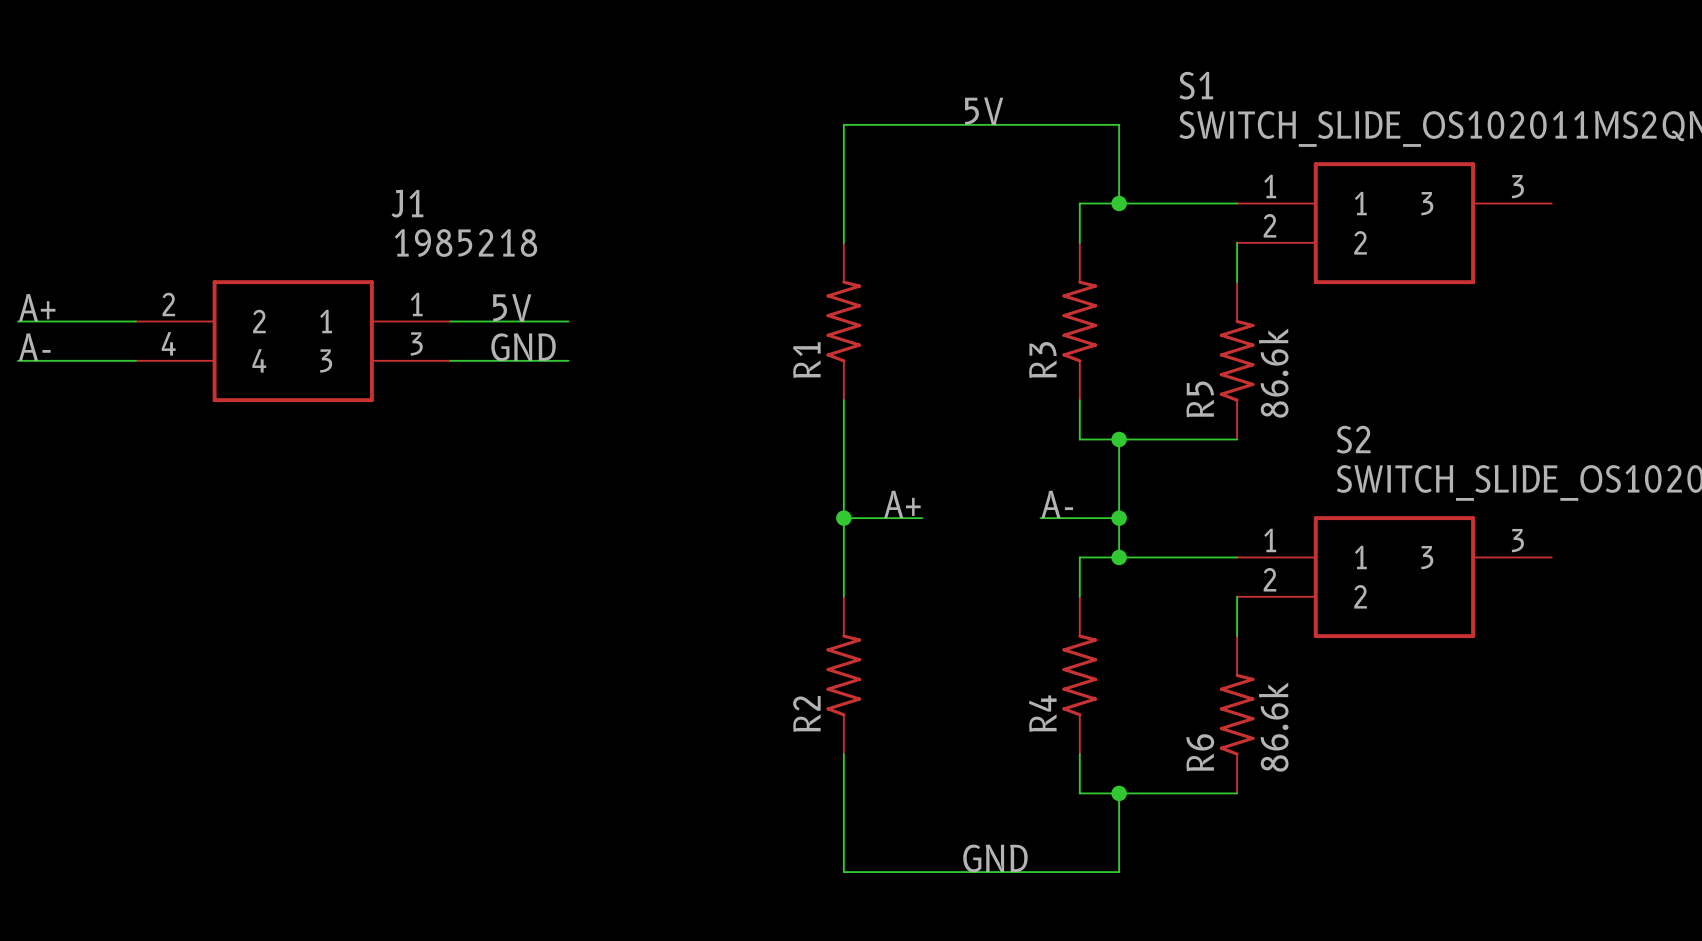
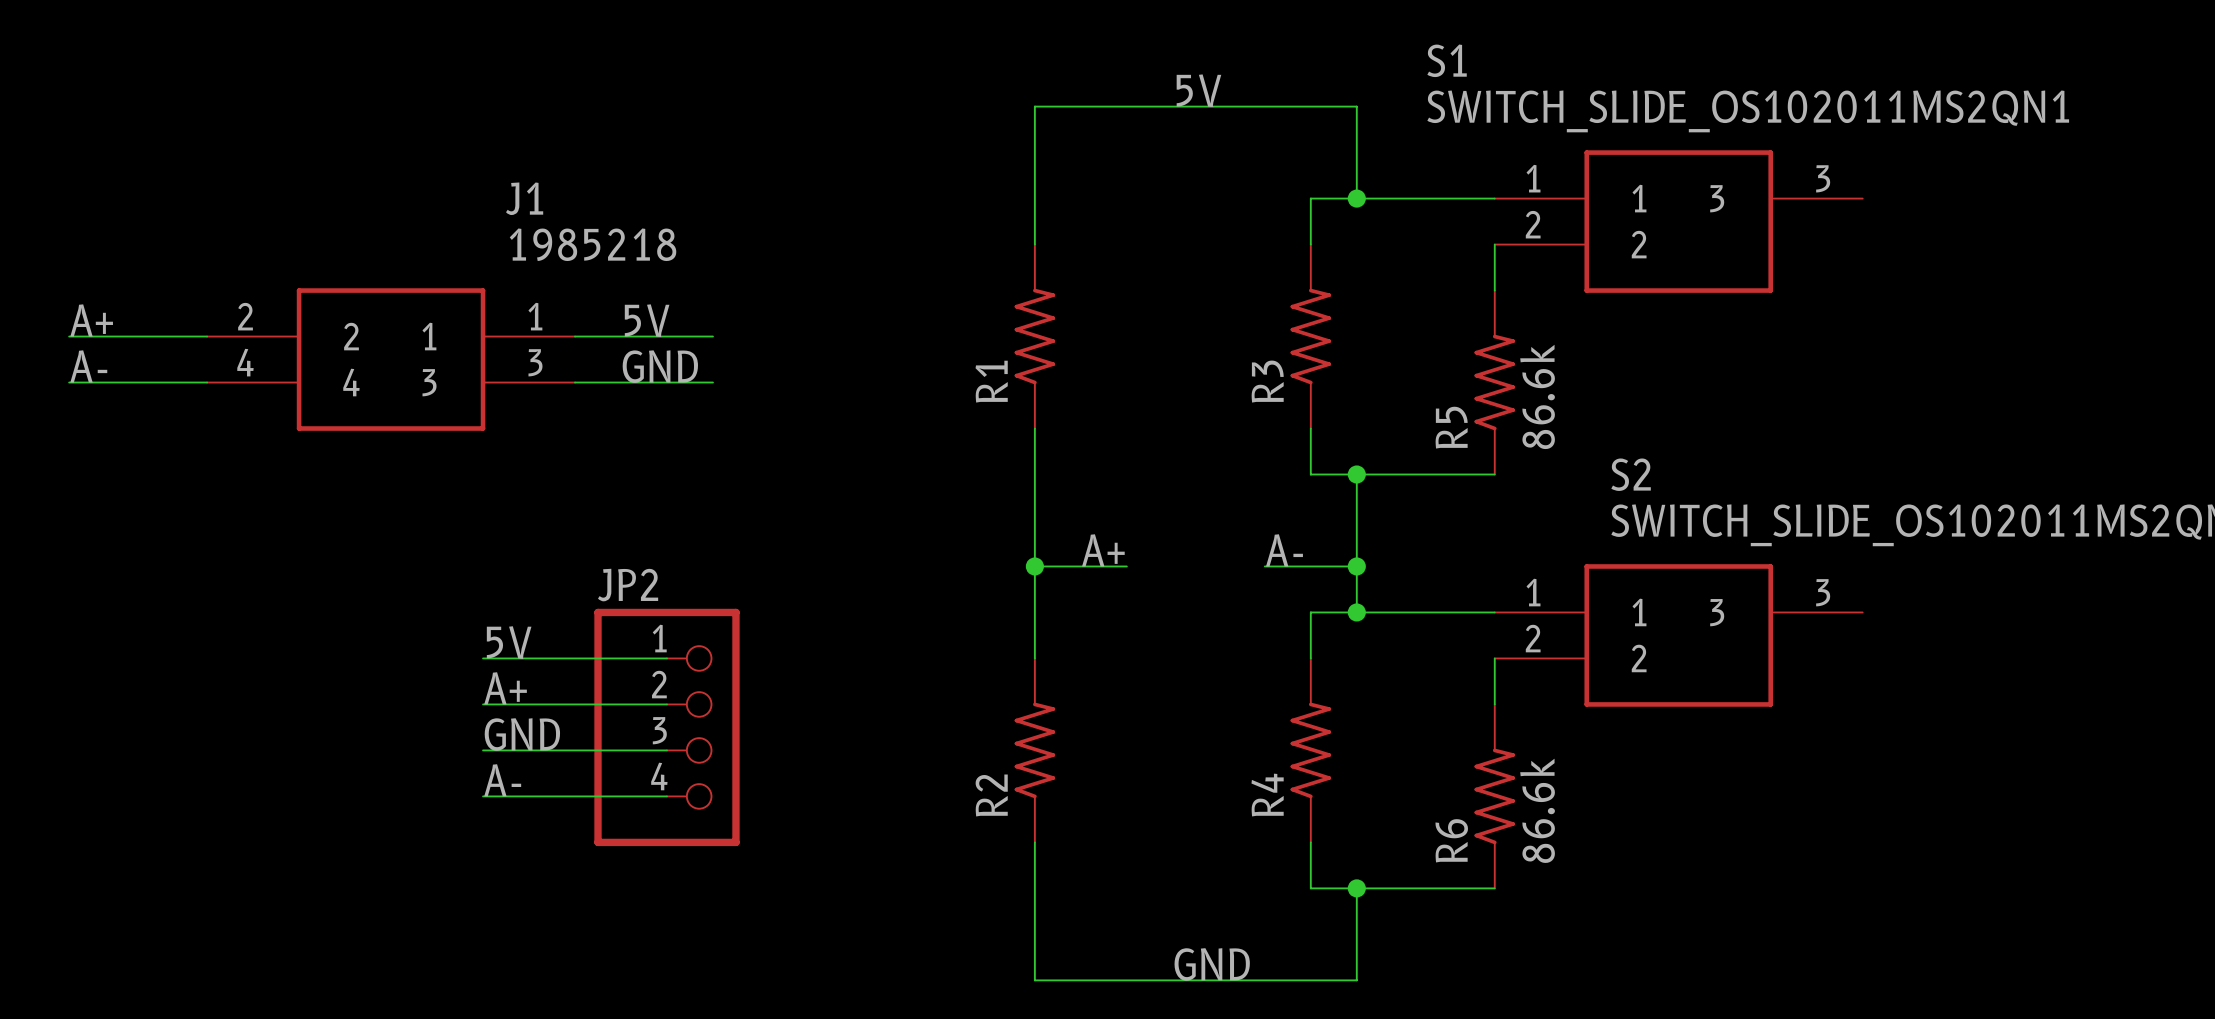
label: none -> 5V (509, 642)
wire: none -> (483, 658) (666, 658)
label: none -> A+ (505, 688)
wire: none -> (483, 704) (666, 704)
JP2: none -> (666, 727)
label: none -> GND (522, 734)
wire: none -> (483, 750) (666, 750)
label: none -> A- (502, 780)
wire: none -> (483, 796) (666, 796)

